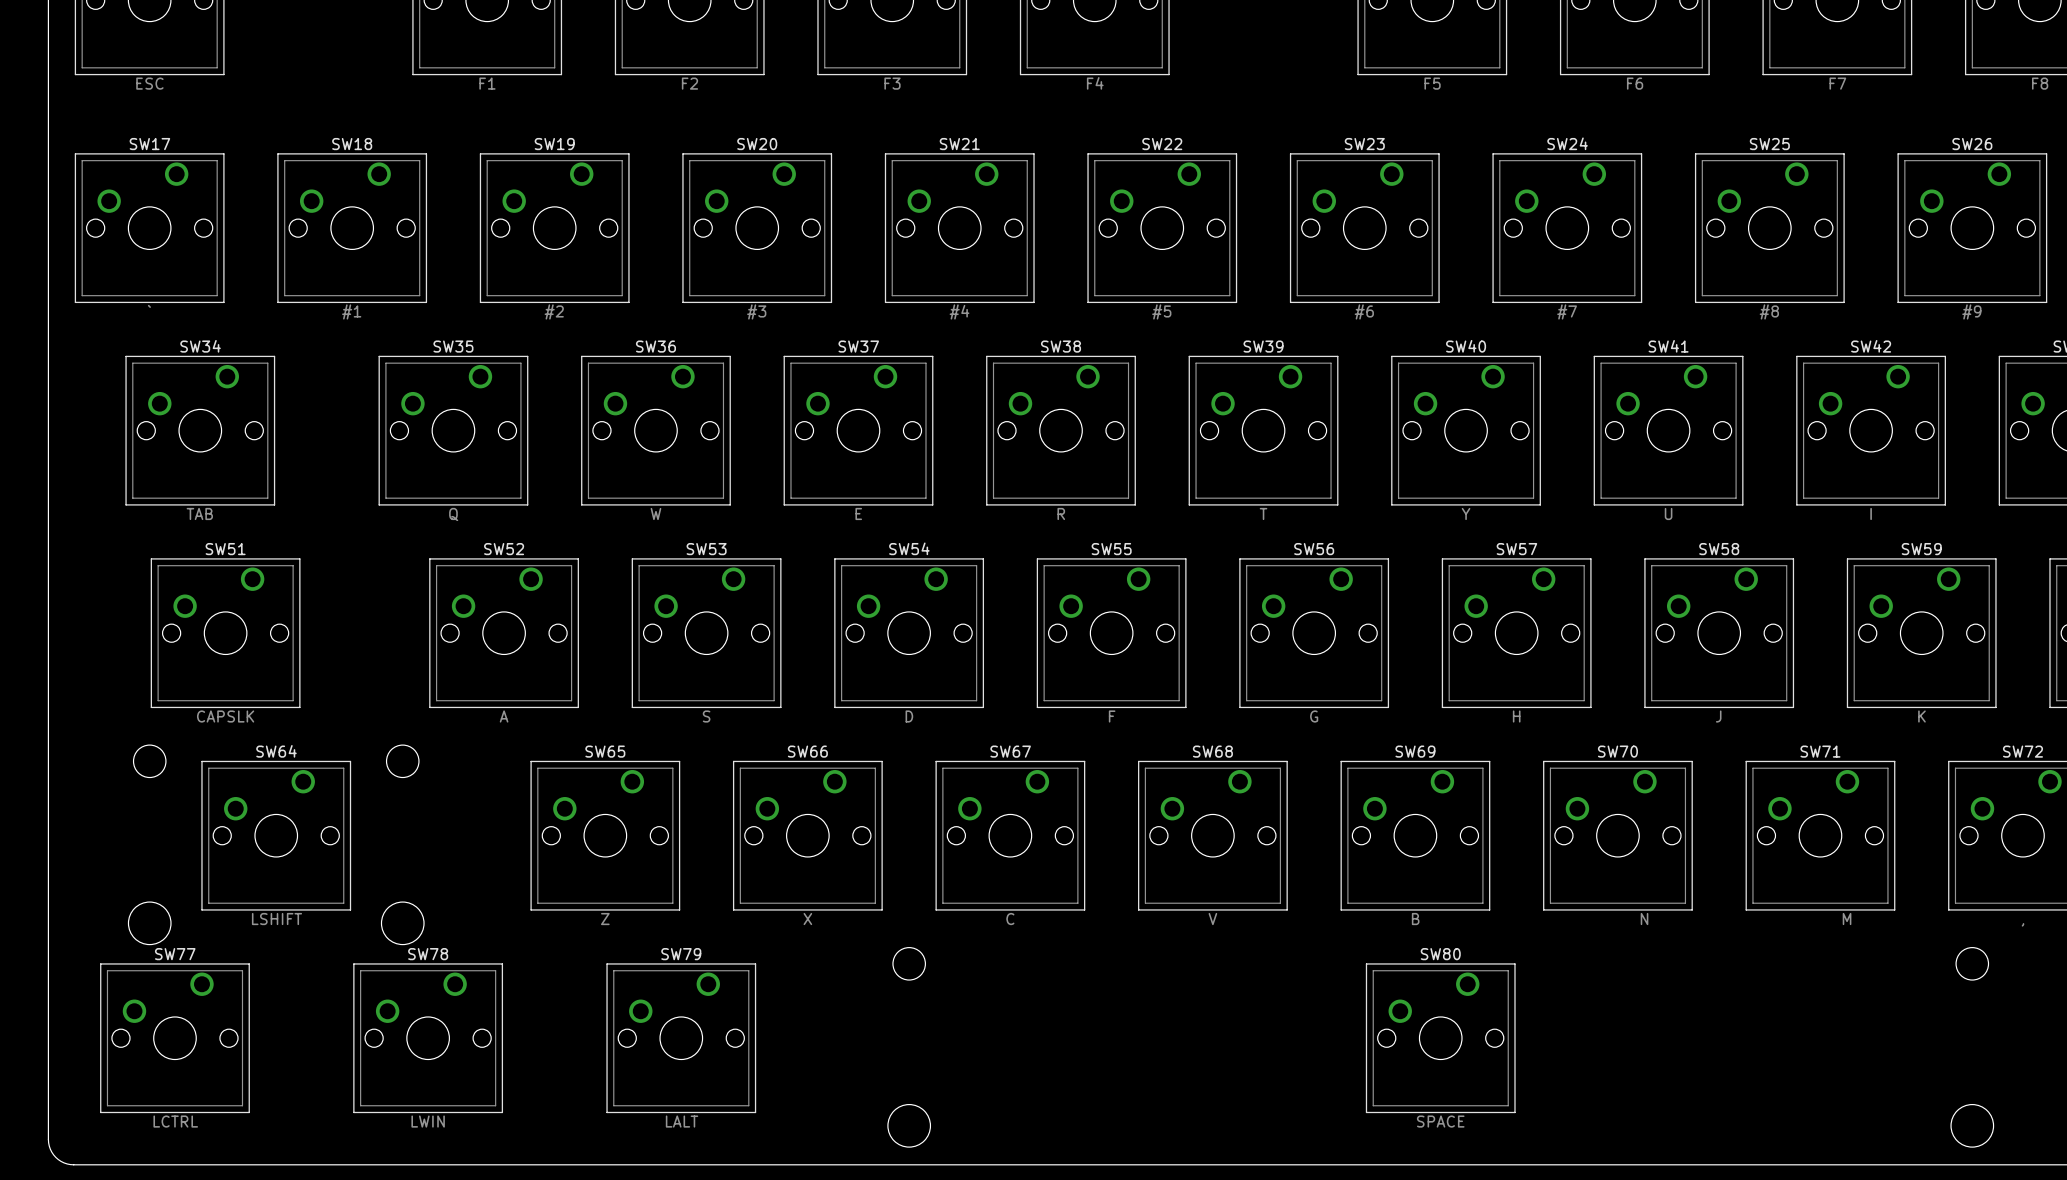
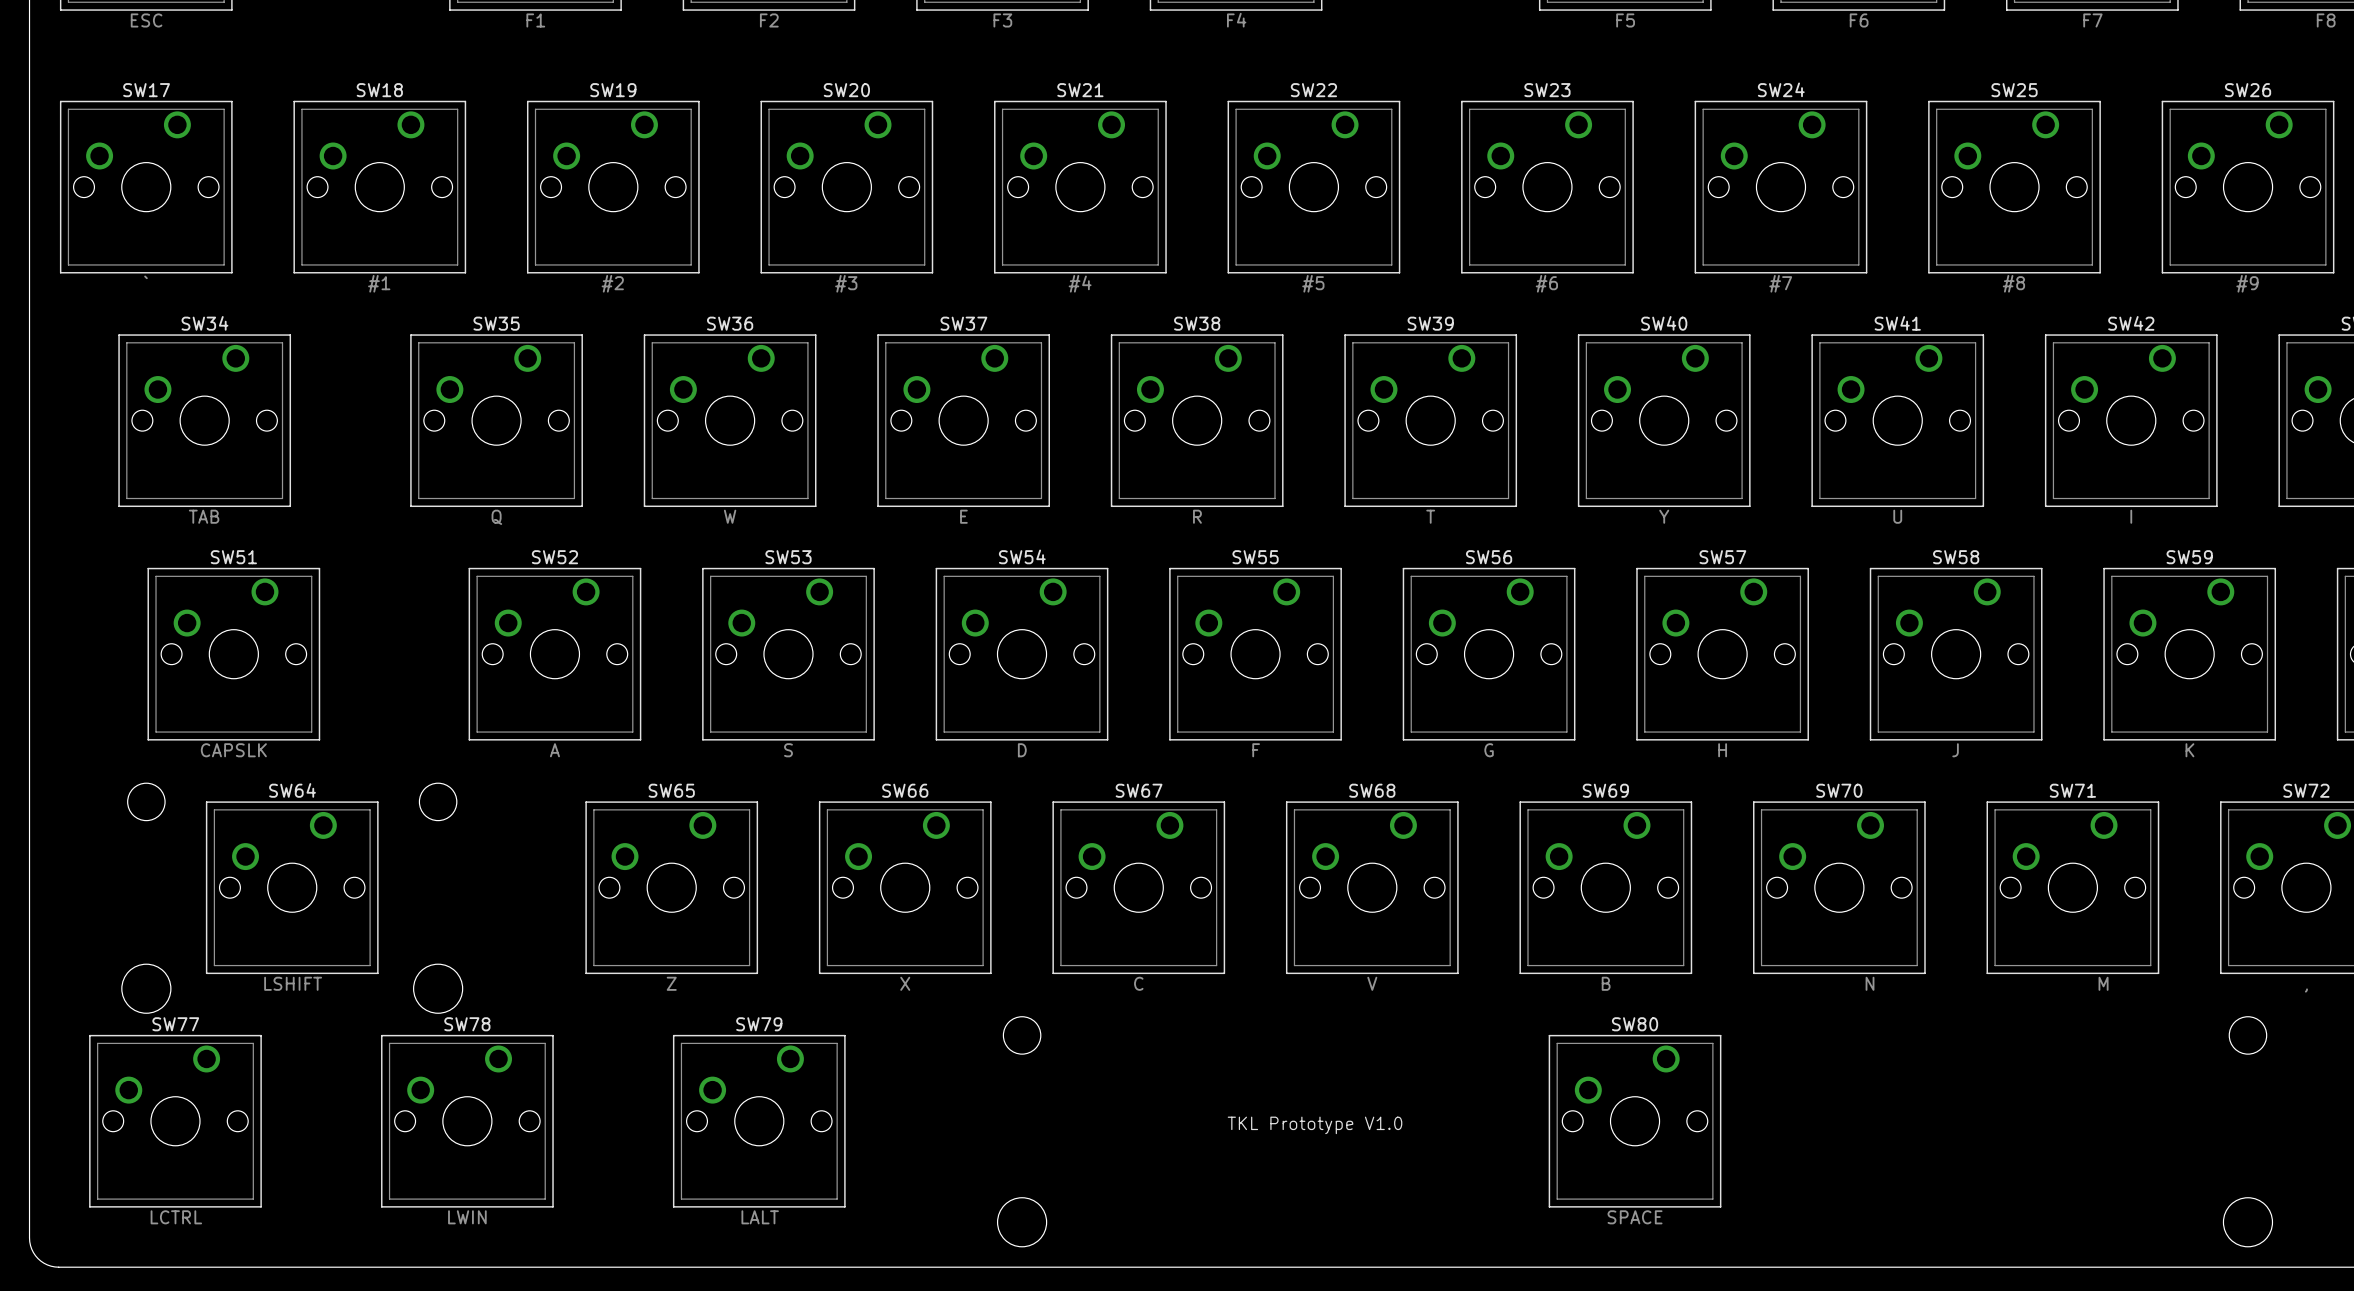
text: none -> TKL Prototype V1.0 (1315, 1125)

